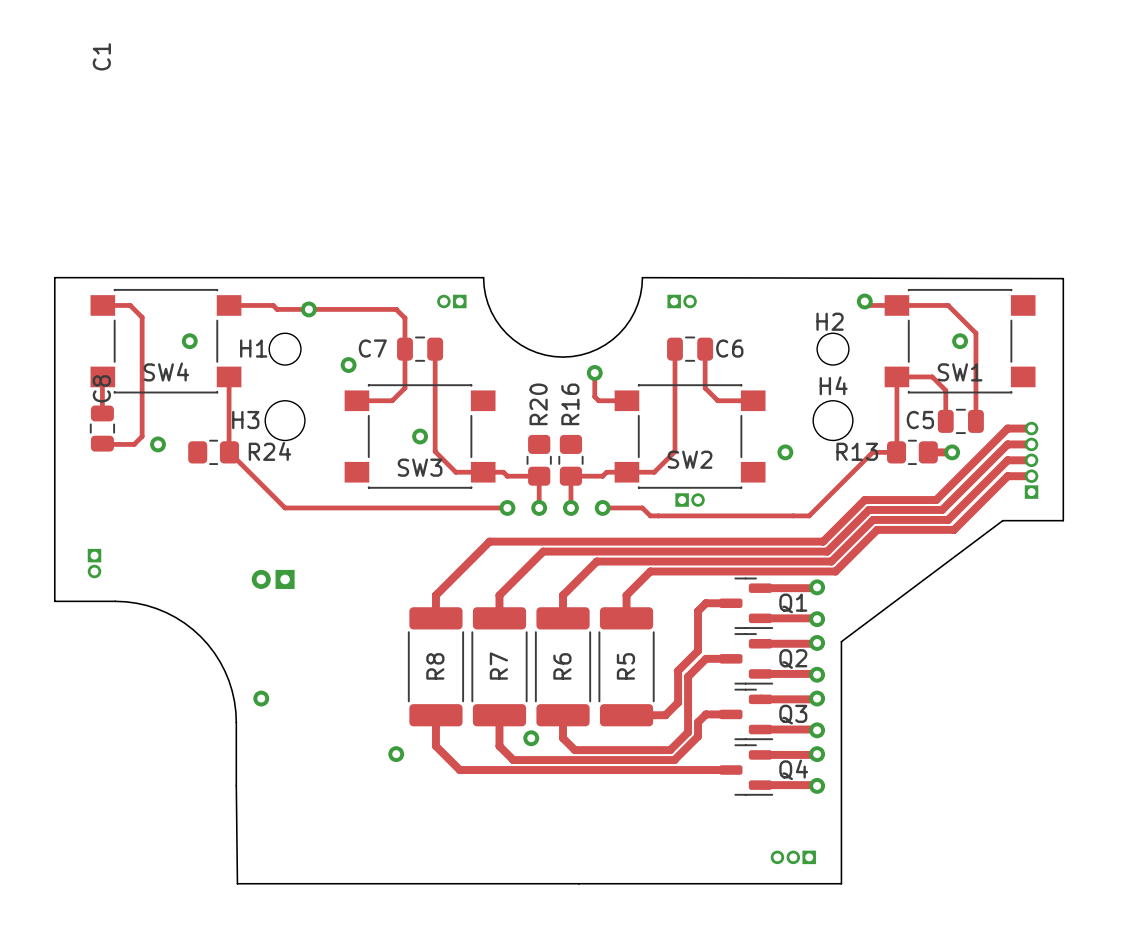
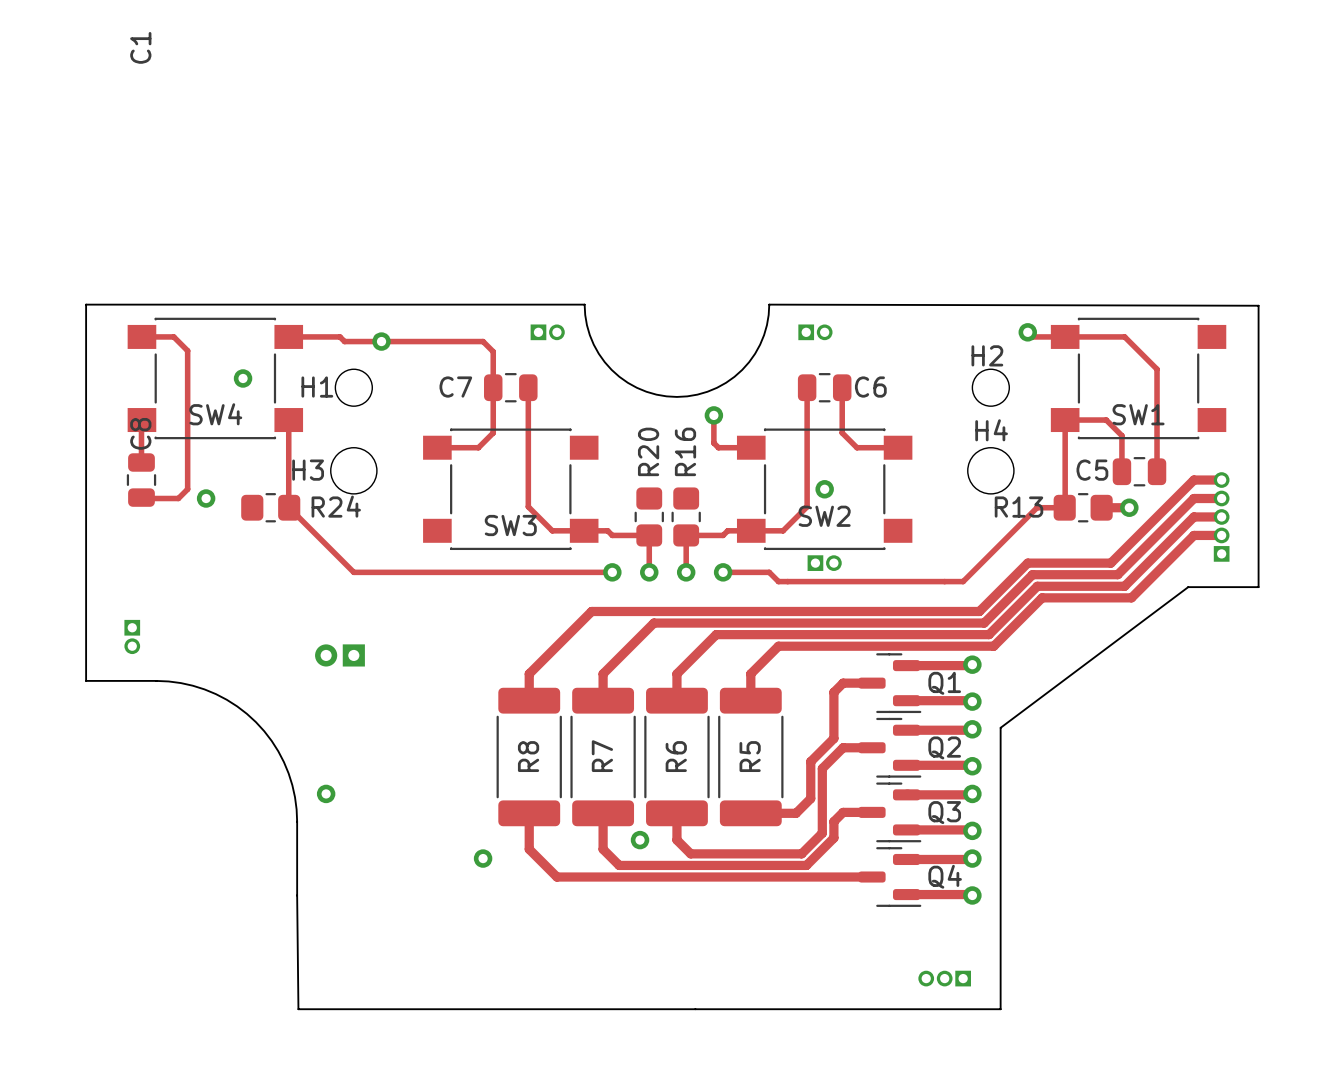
part rotation: 0° (451, 301) -> 180° (547, 332)
via: (960, 341) -> none
via: (348, 365) -> none
via: (420, 436) -> none
via: none -> (824, 489)
via: (785, 452) -> none

